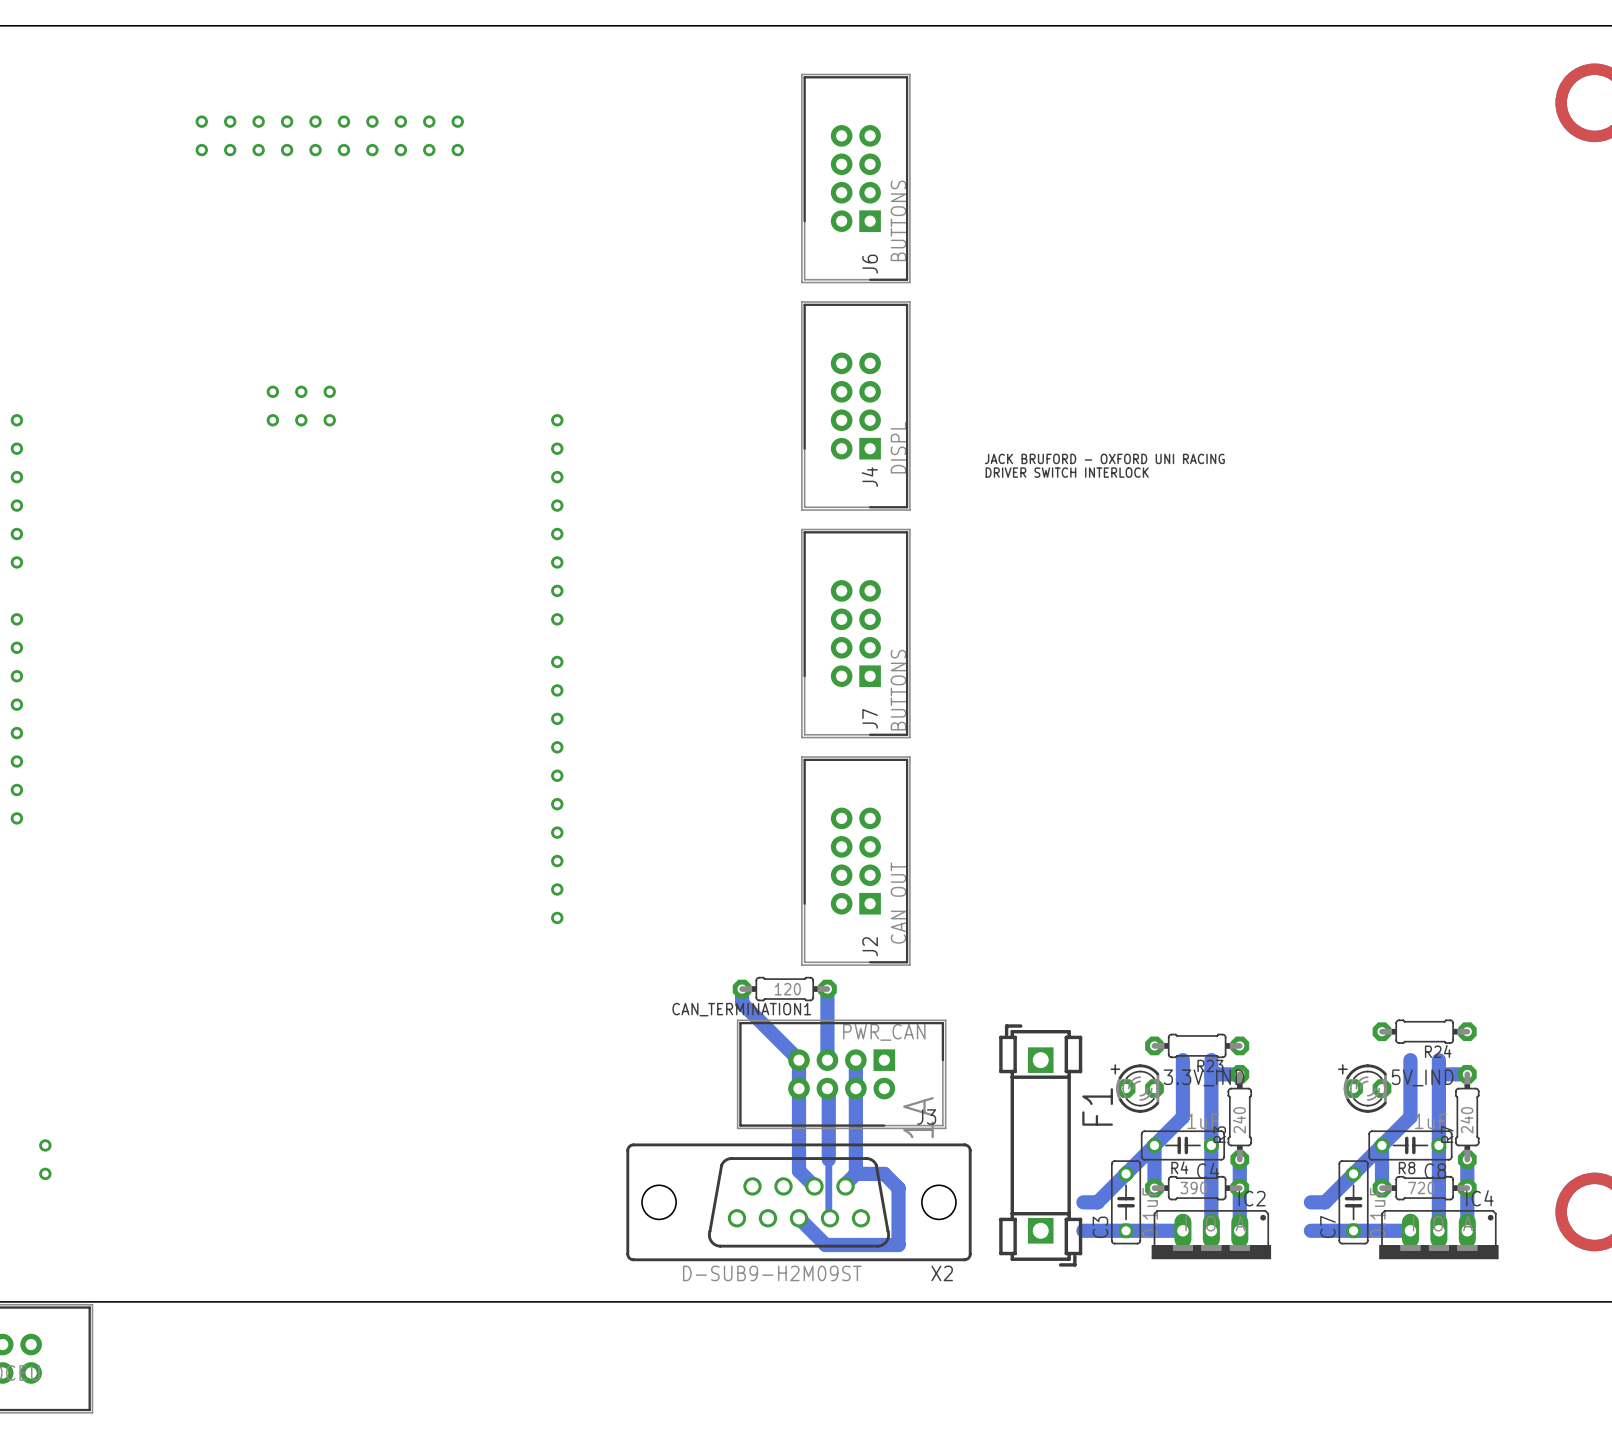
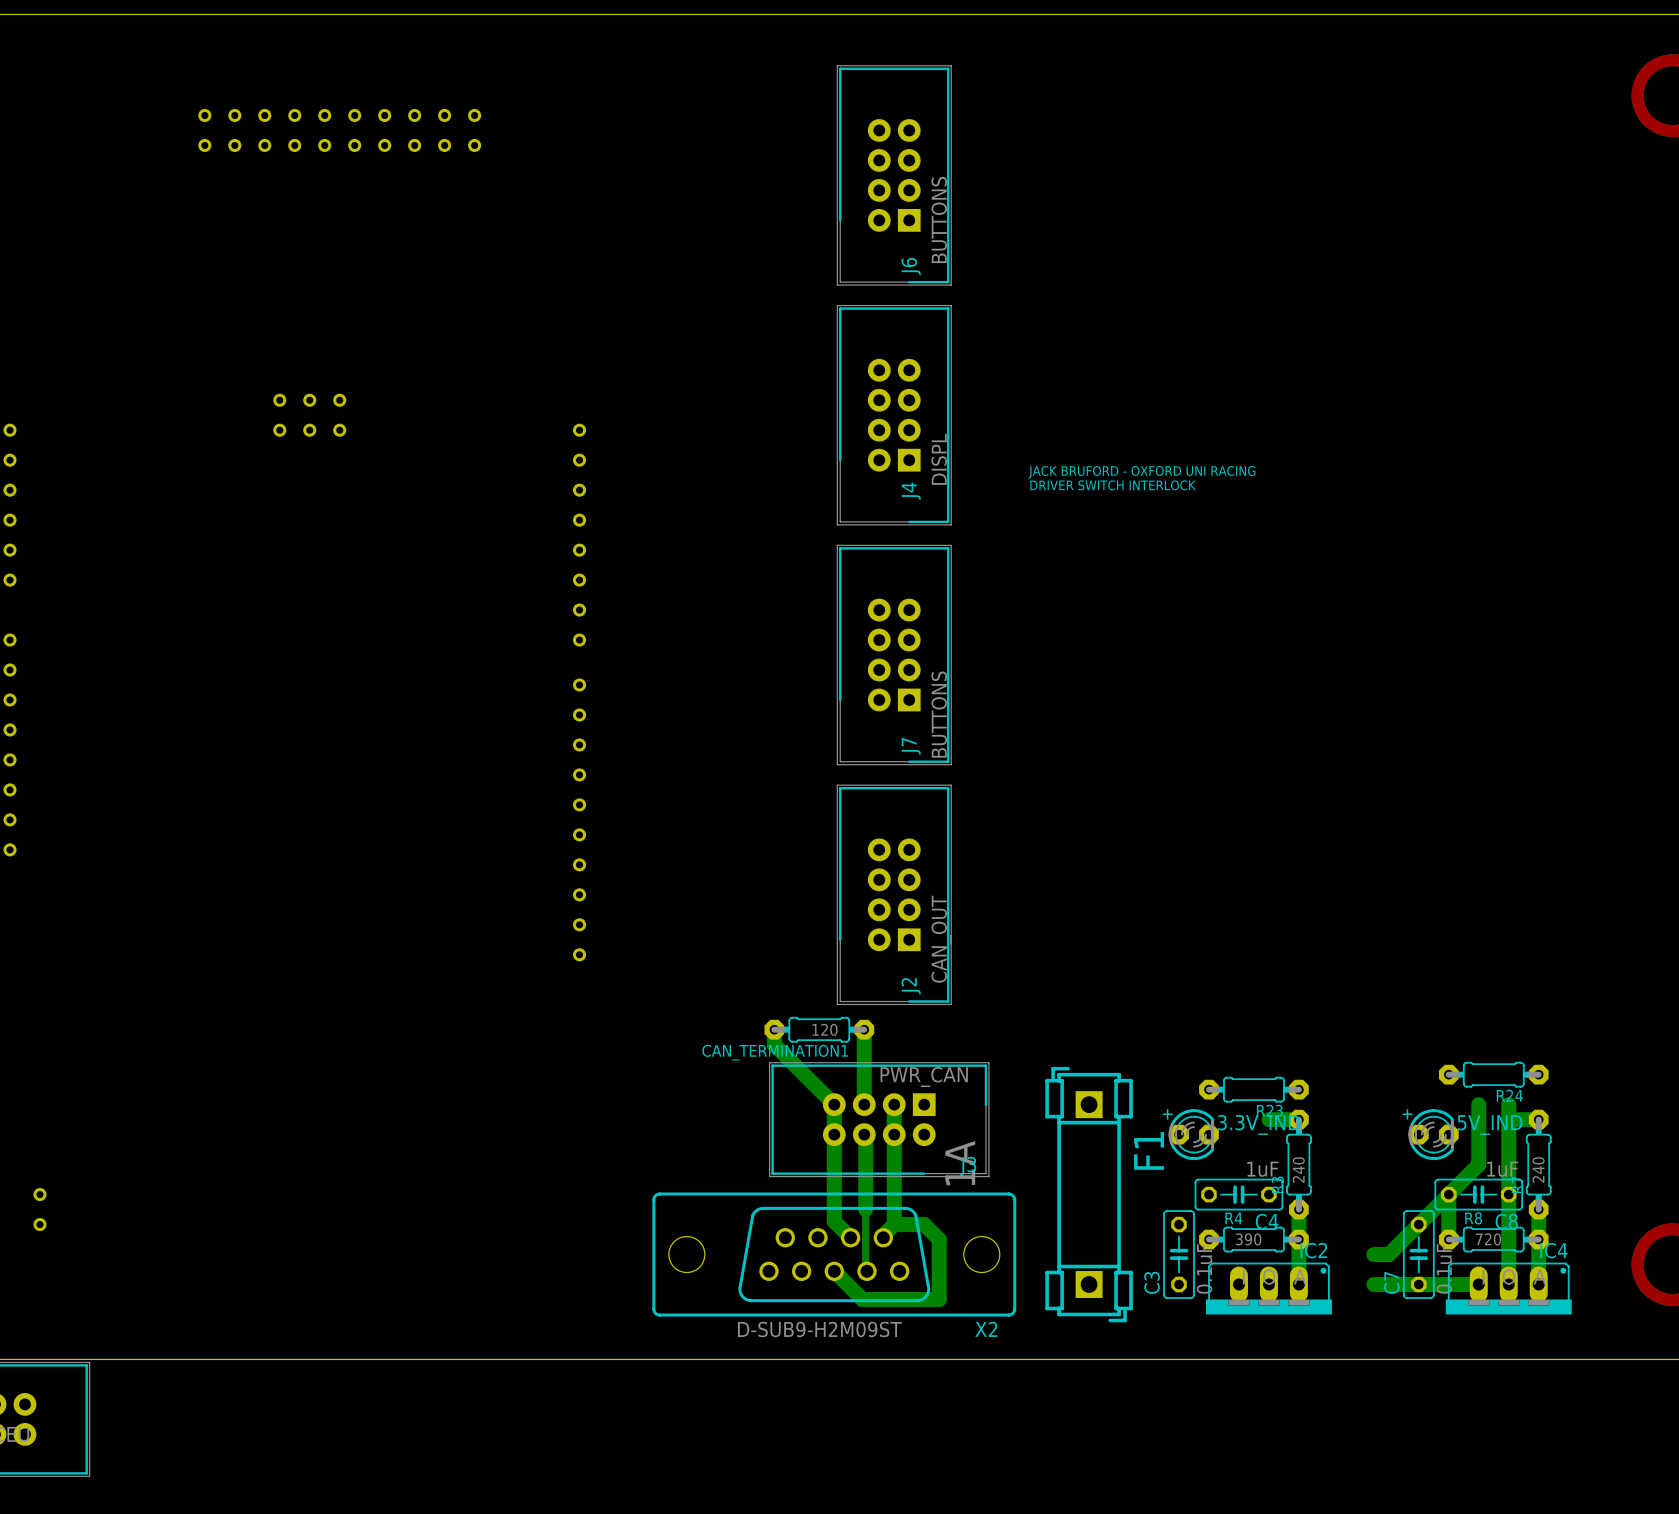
bottom track: (1182, 1060) (1182, 1117) (1097, 1202) (1083, 1202) -> none
bottom track: (1211, 1060) (1211, 1230) -> none
bottom track: (1154, 1145) (1154, 1188) -> none
bottom track: (1083, 1230) (1182, 1230) -> none

